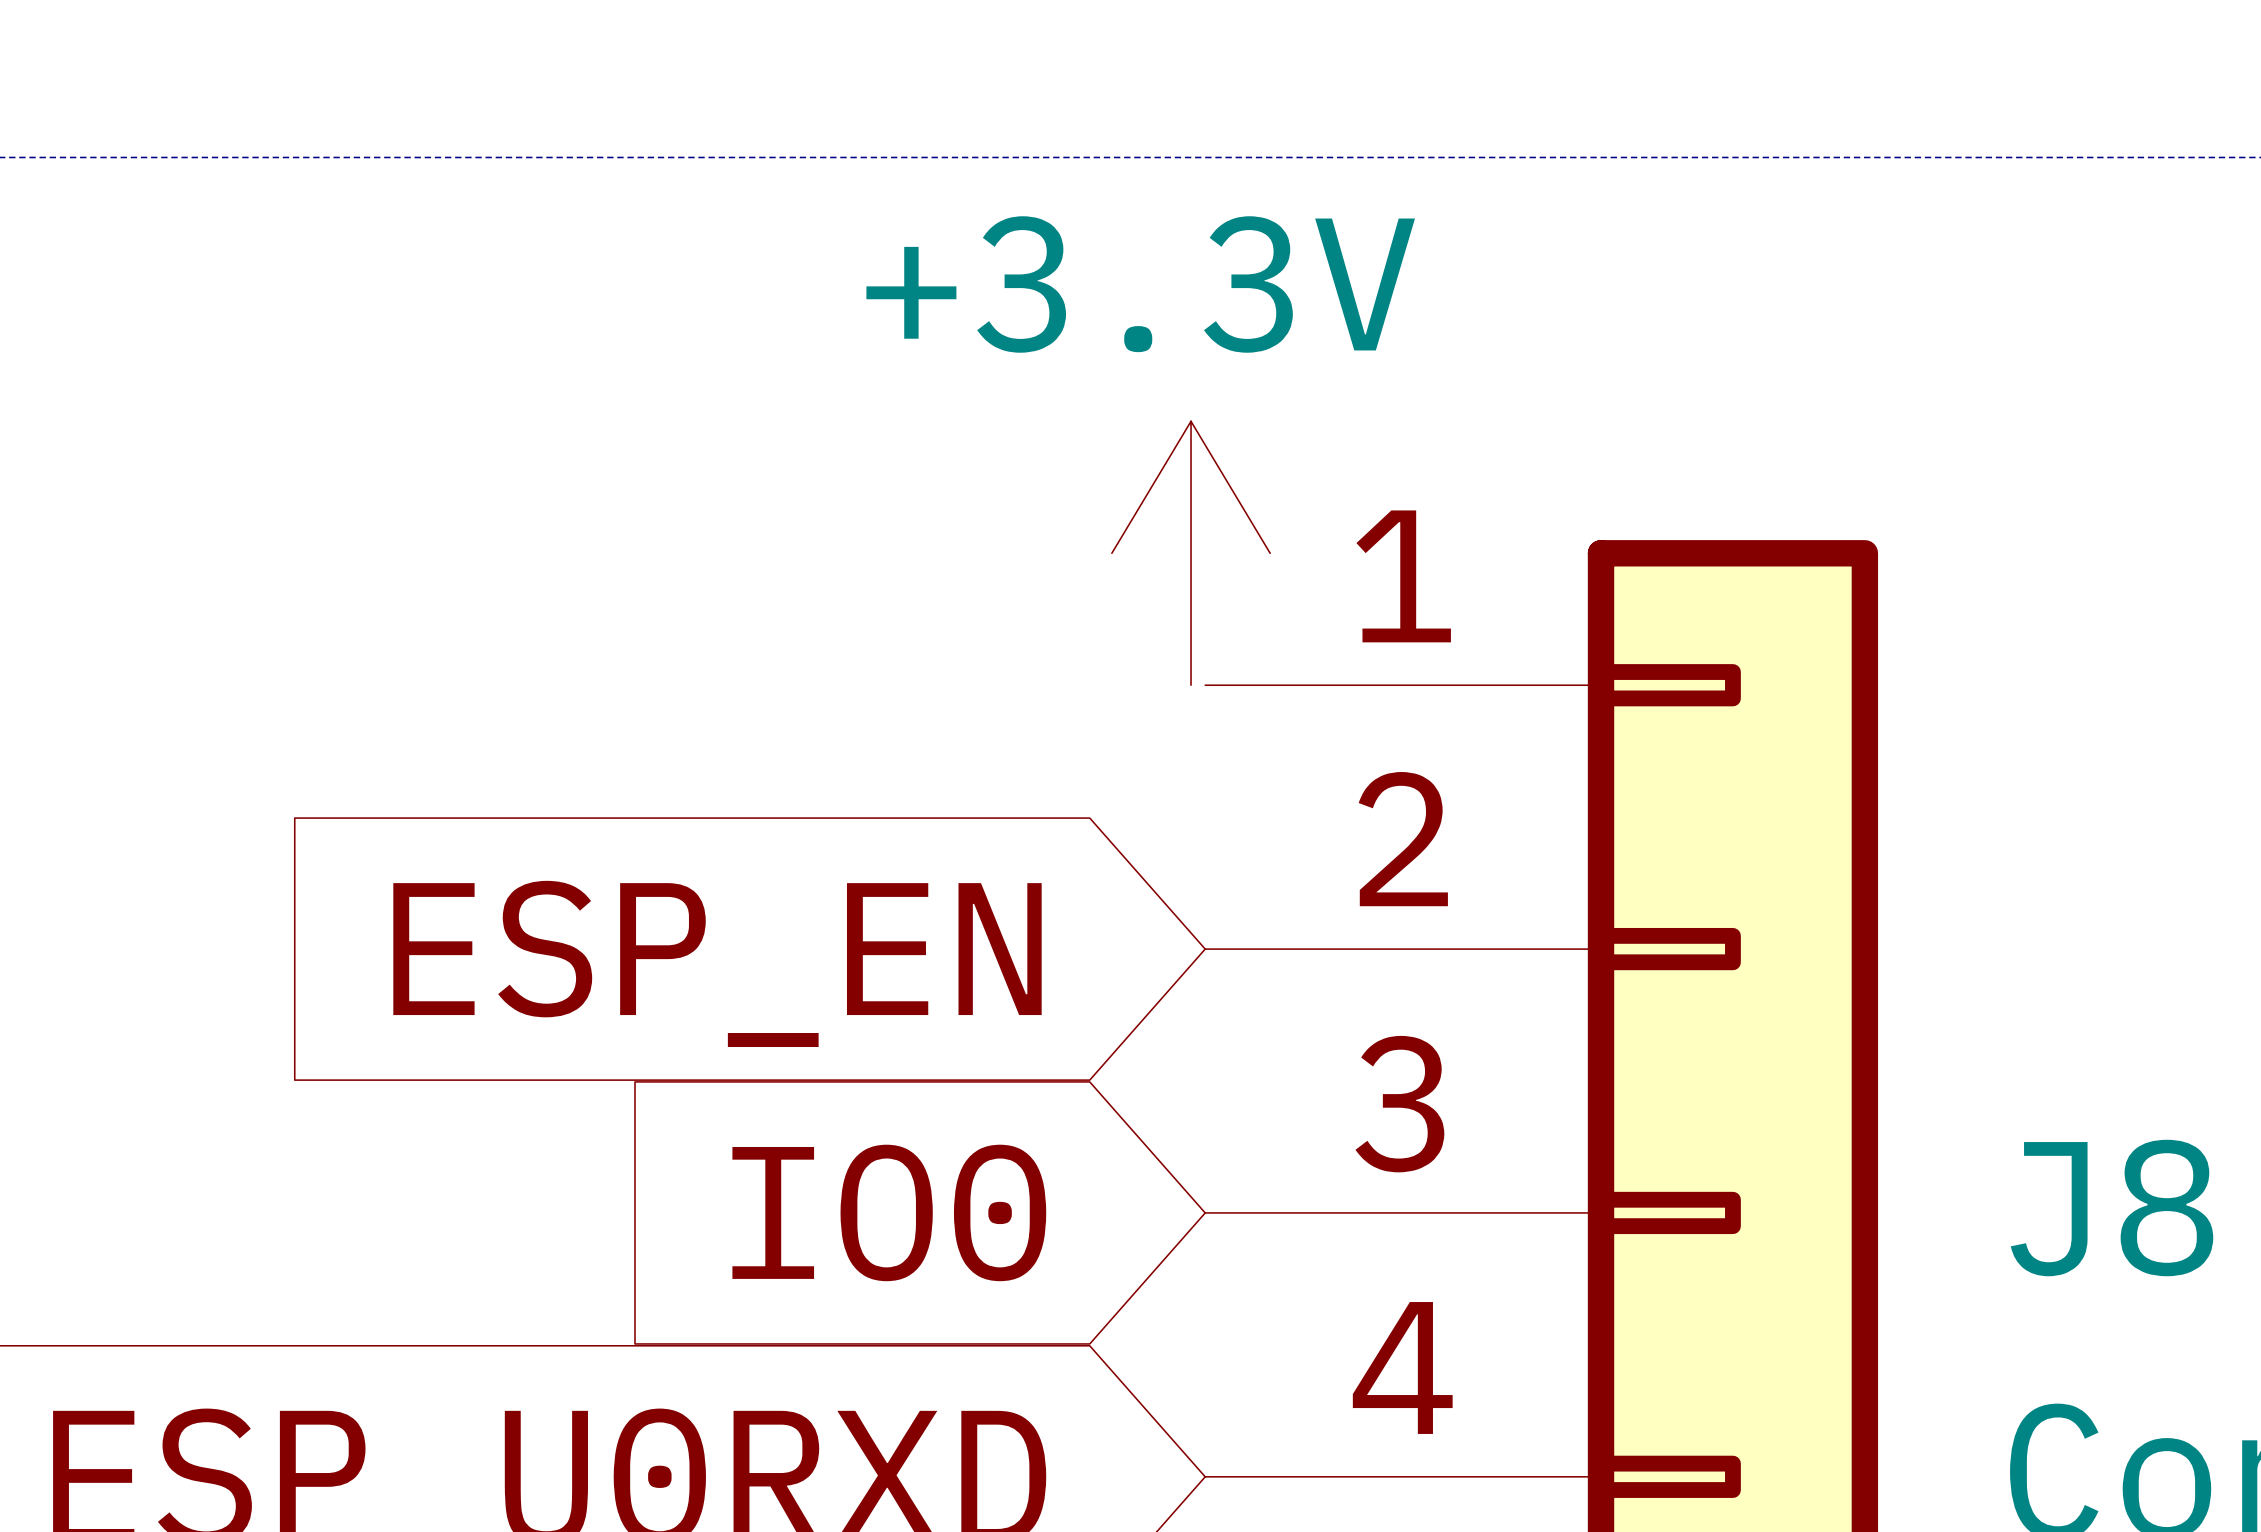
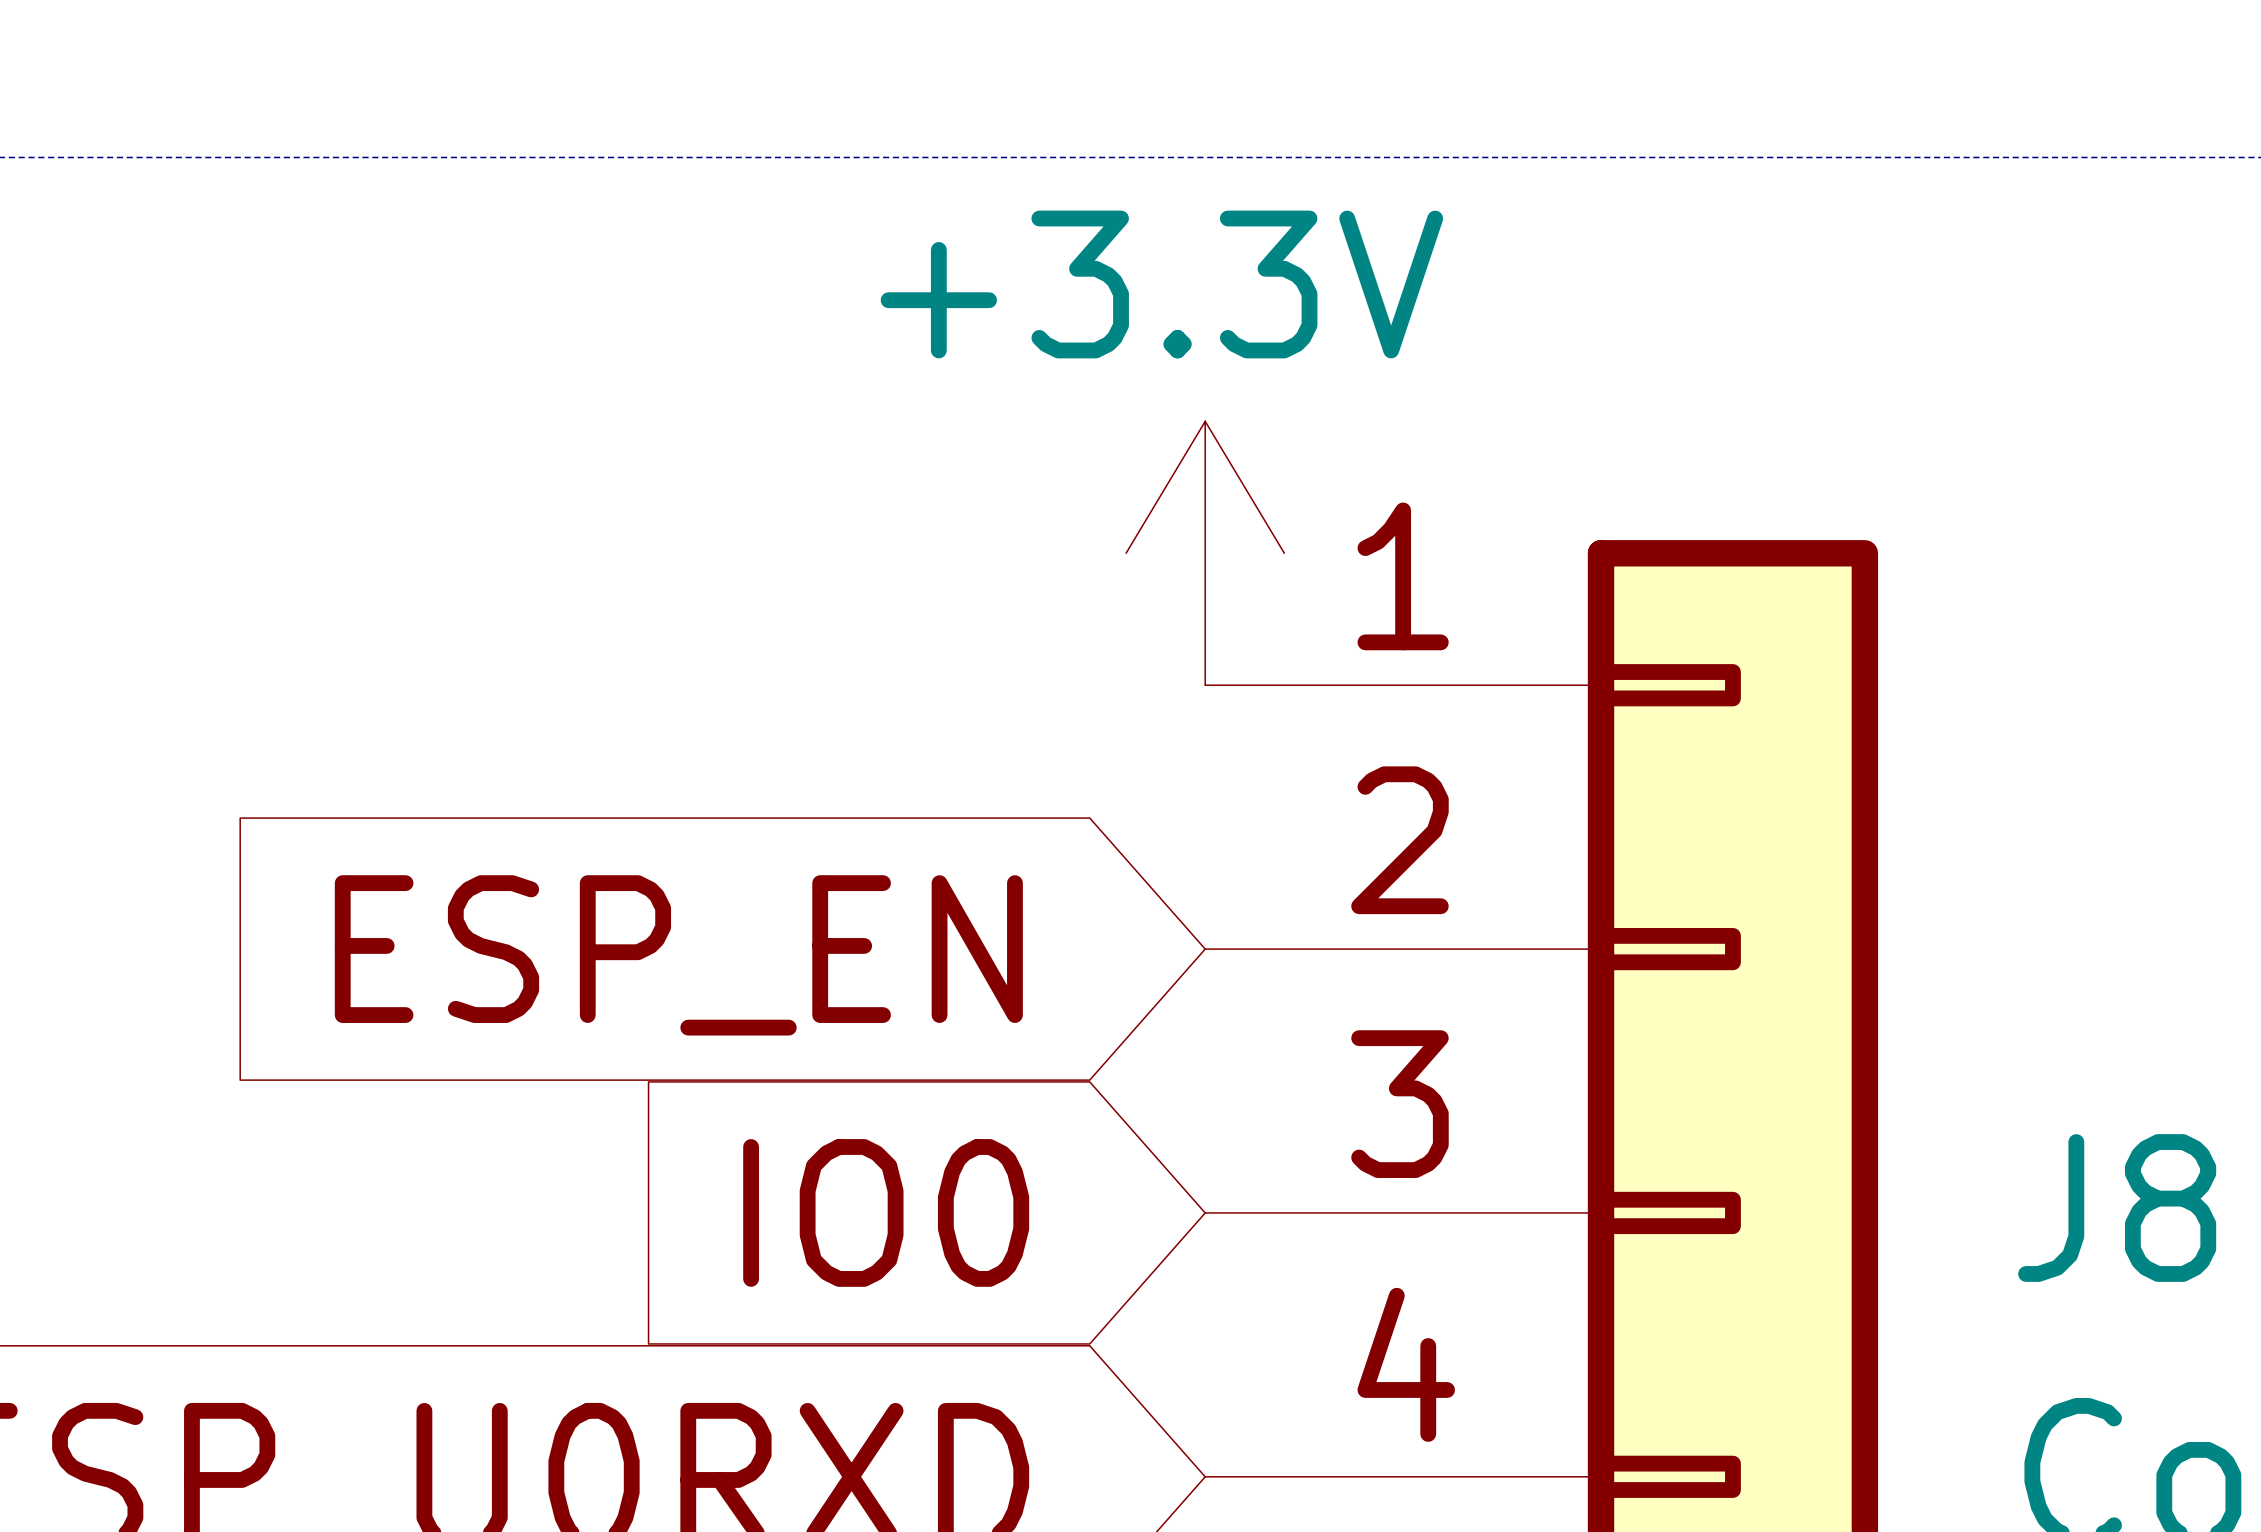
power symbol position: +3.3V (1191, 553) -> +3.3V (1205, 553)

